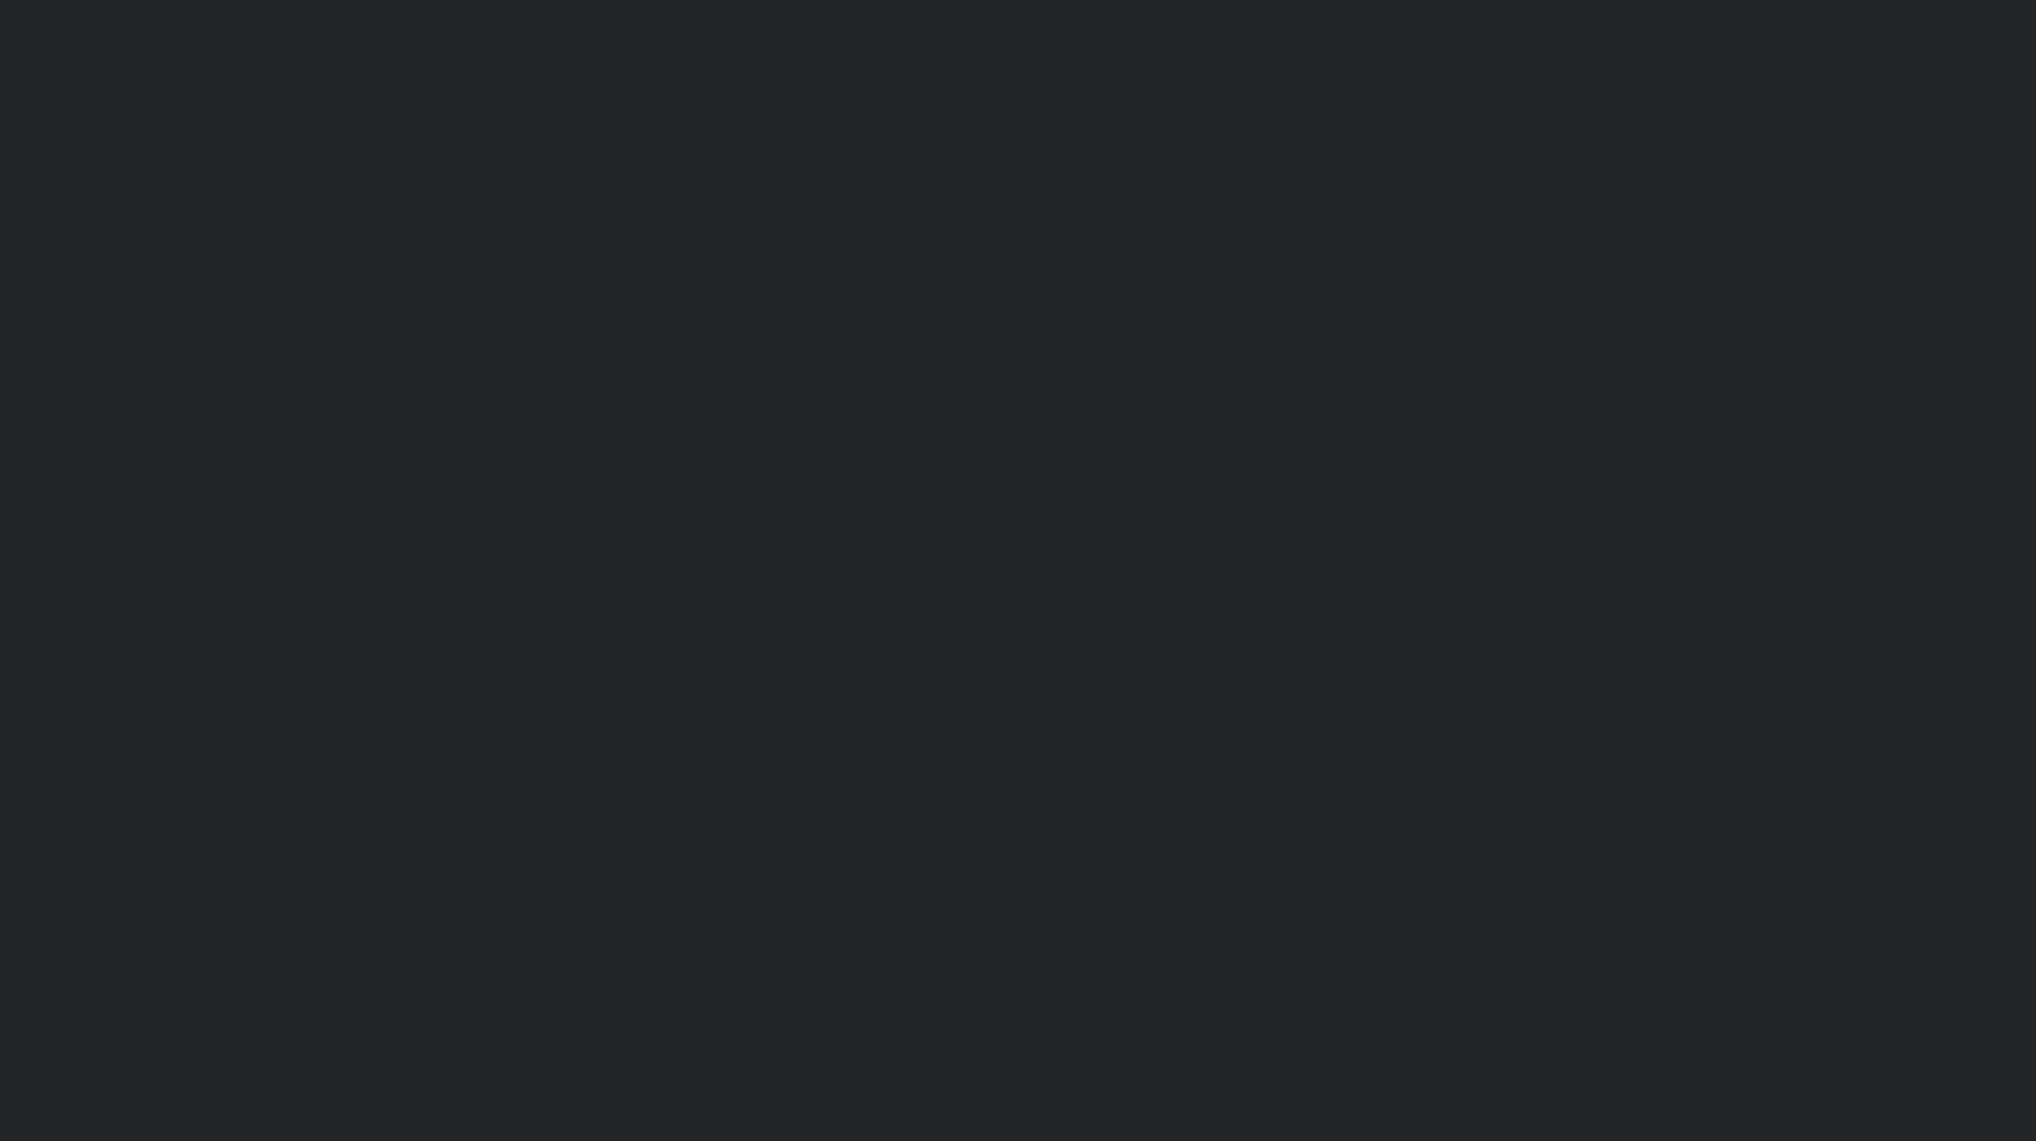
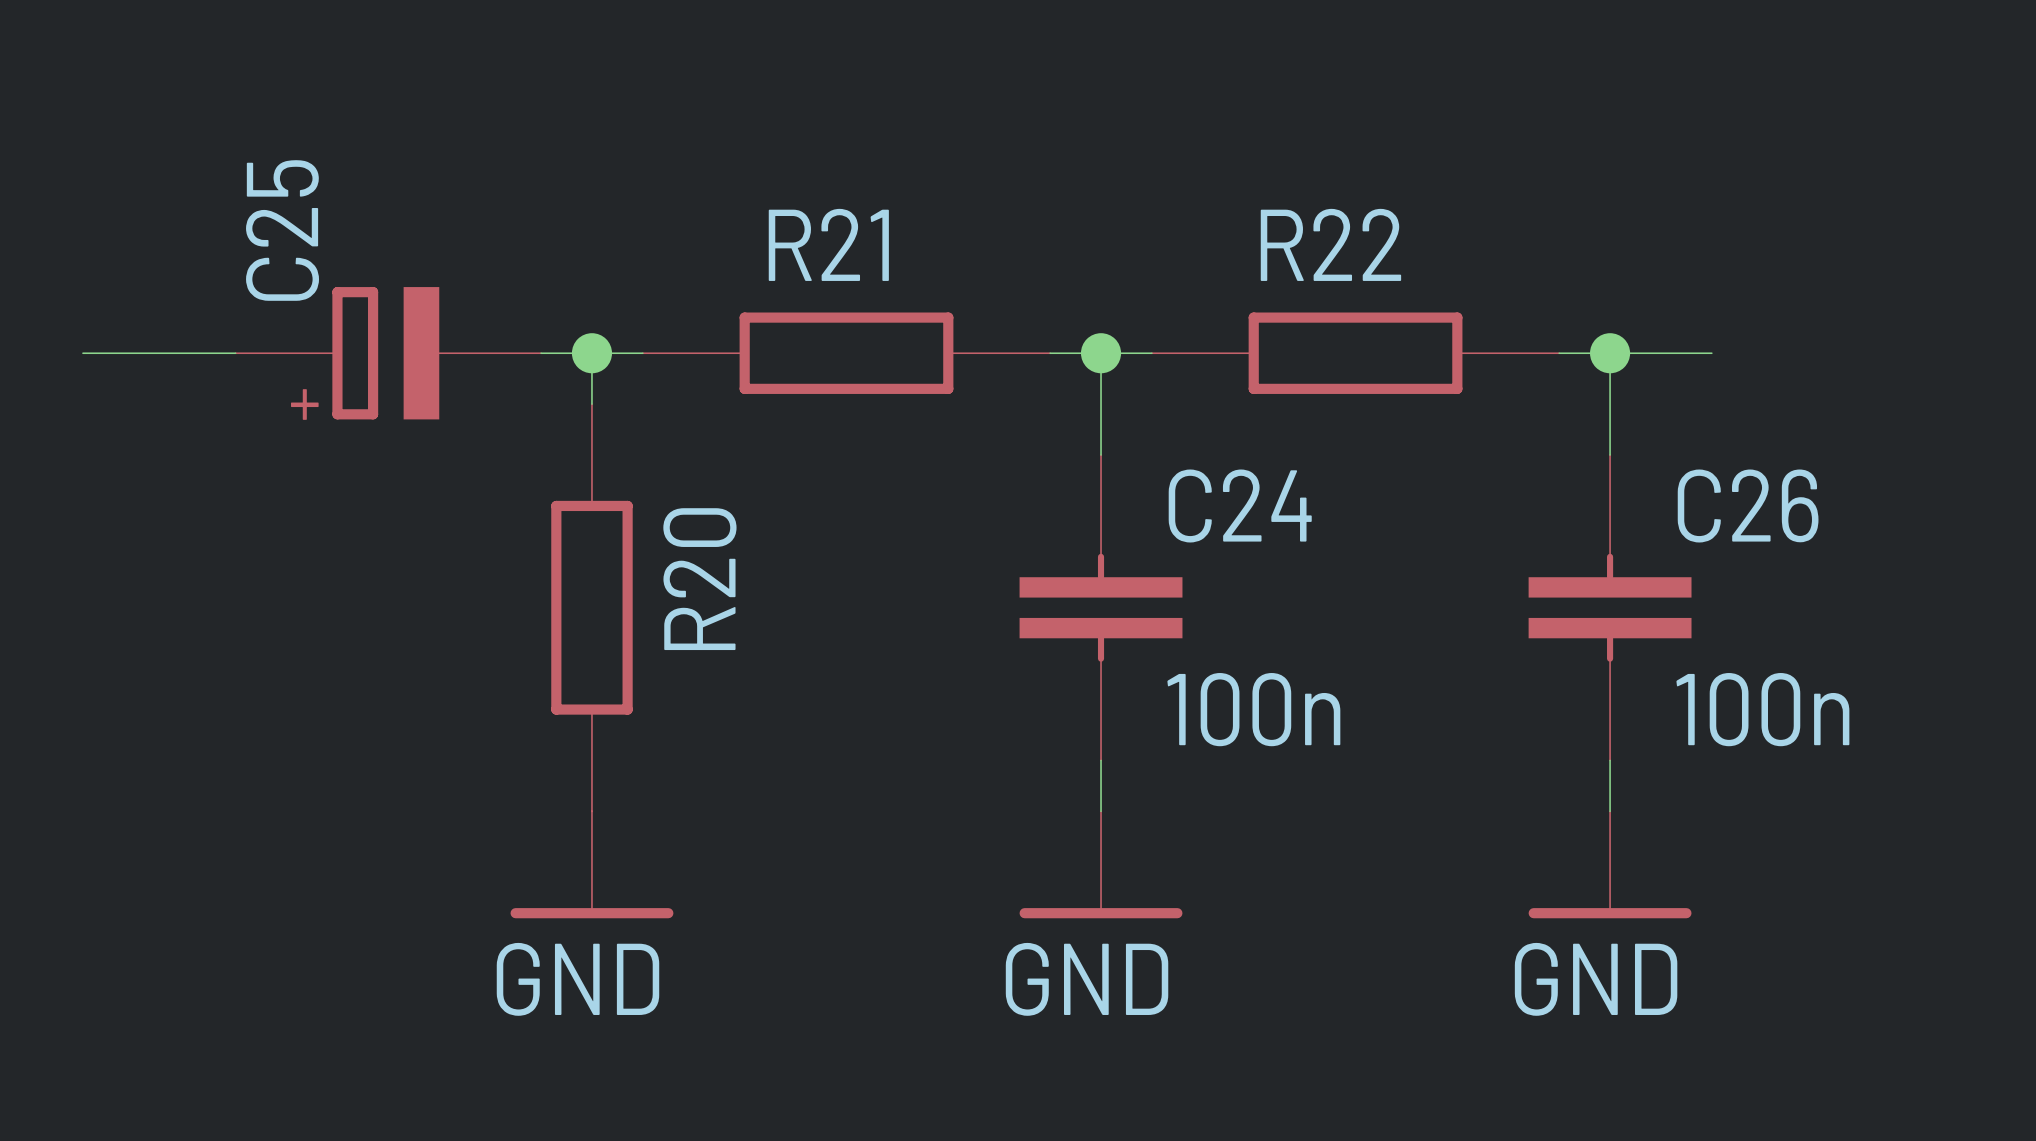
wire: none -> (82, 353) (235, 353)
C25: none -> (388, 353)
wire: none -> (541, 353) (642, 353)
wire: none -> (591, 353) (591, 404)
junction: none -> (591, 353)
R21: none -> (846, 353)
wire: none -> (1050, 353) (1151, 353)
wire: none -> (1101, 353) (1101, 455)
junction: none -> (1101, 353)
R22: none -> (1355, 353)
wire: none -> (1559, 353) (1711, 353)
wire: none -> (1610, 353) (1610, 455)
junction: none -> (1610, 353)
R20: none -> (591, 607)
C24: none -> 100n (1101, 607)
C26: none -> 100n (1610, 607)
wire: none -> (1101, 760) (1101, 811)
wire: none -> (1610, 760) (1610, 811)
power symbol: none -> GND (591, 864)
power symbol: none -> GND (1101, 864)
power symbol: none -> GND (1610, 864)

